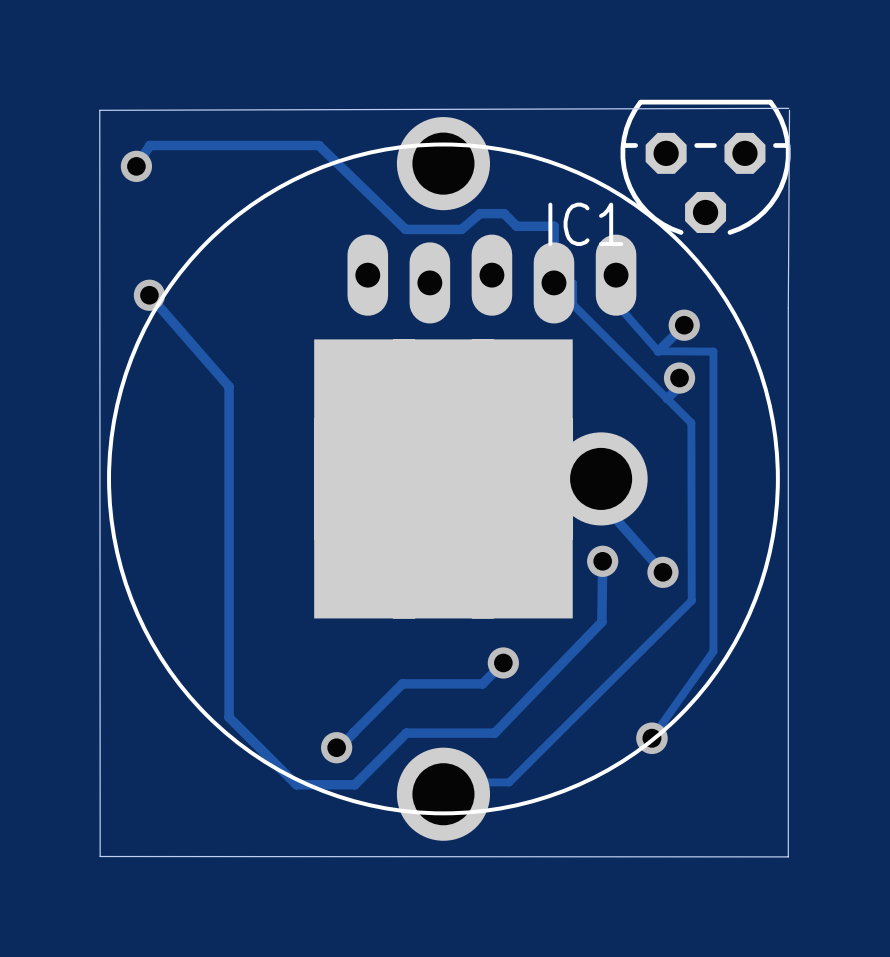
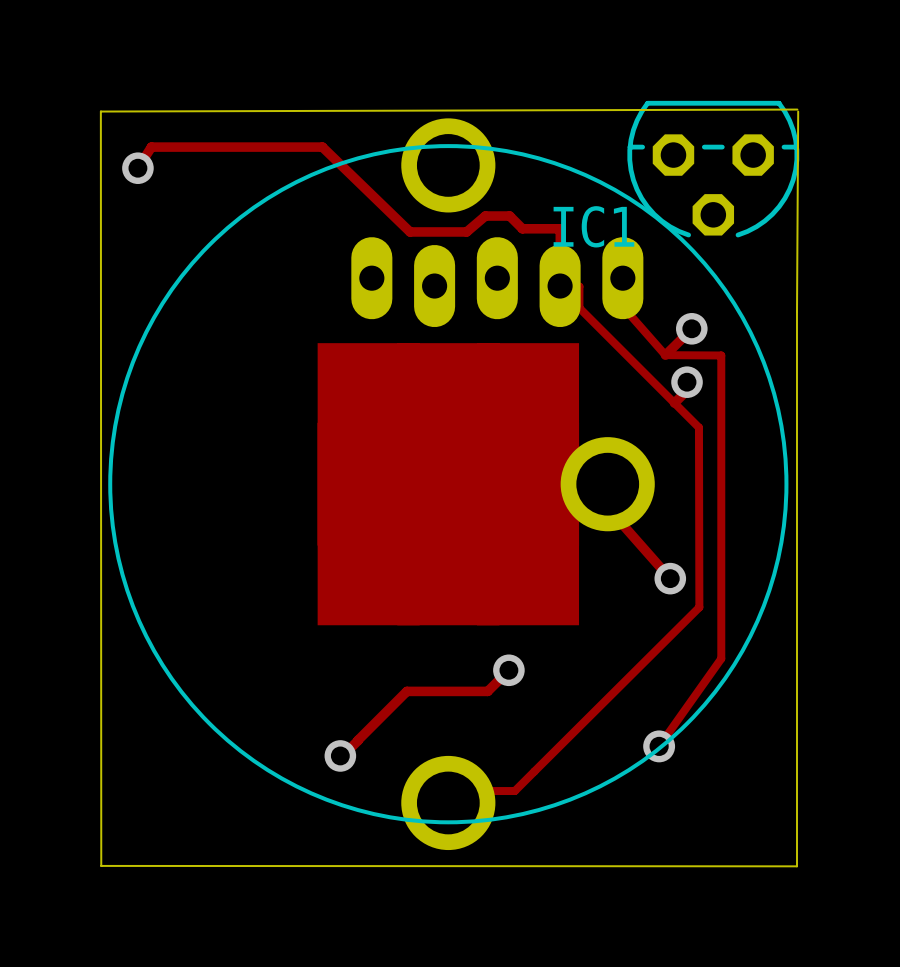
track: (149, 295) (229, 386) (229, 717) (296, 784) (354, 784) (406, 733) (494, 733) (601, 621) (602, 561) -> none
via: (149, 295) -> none
via: (602, 561) -> none

